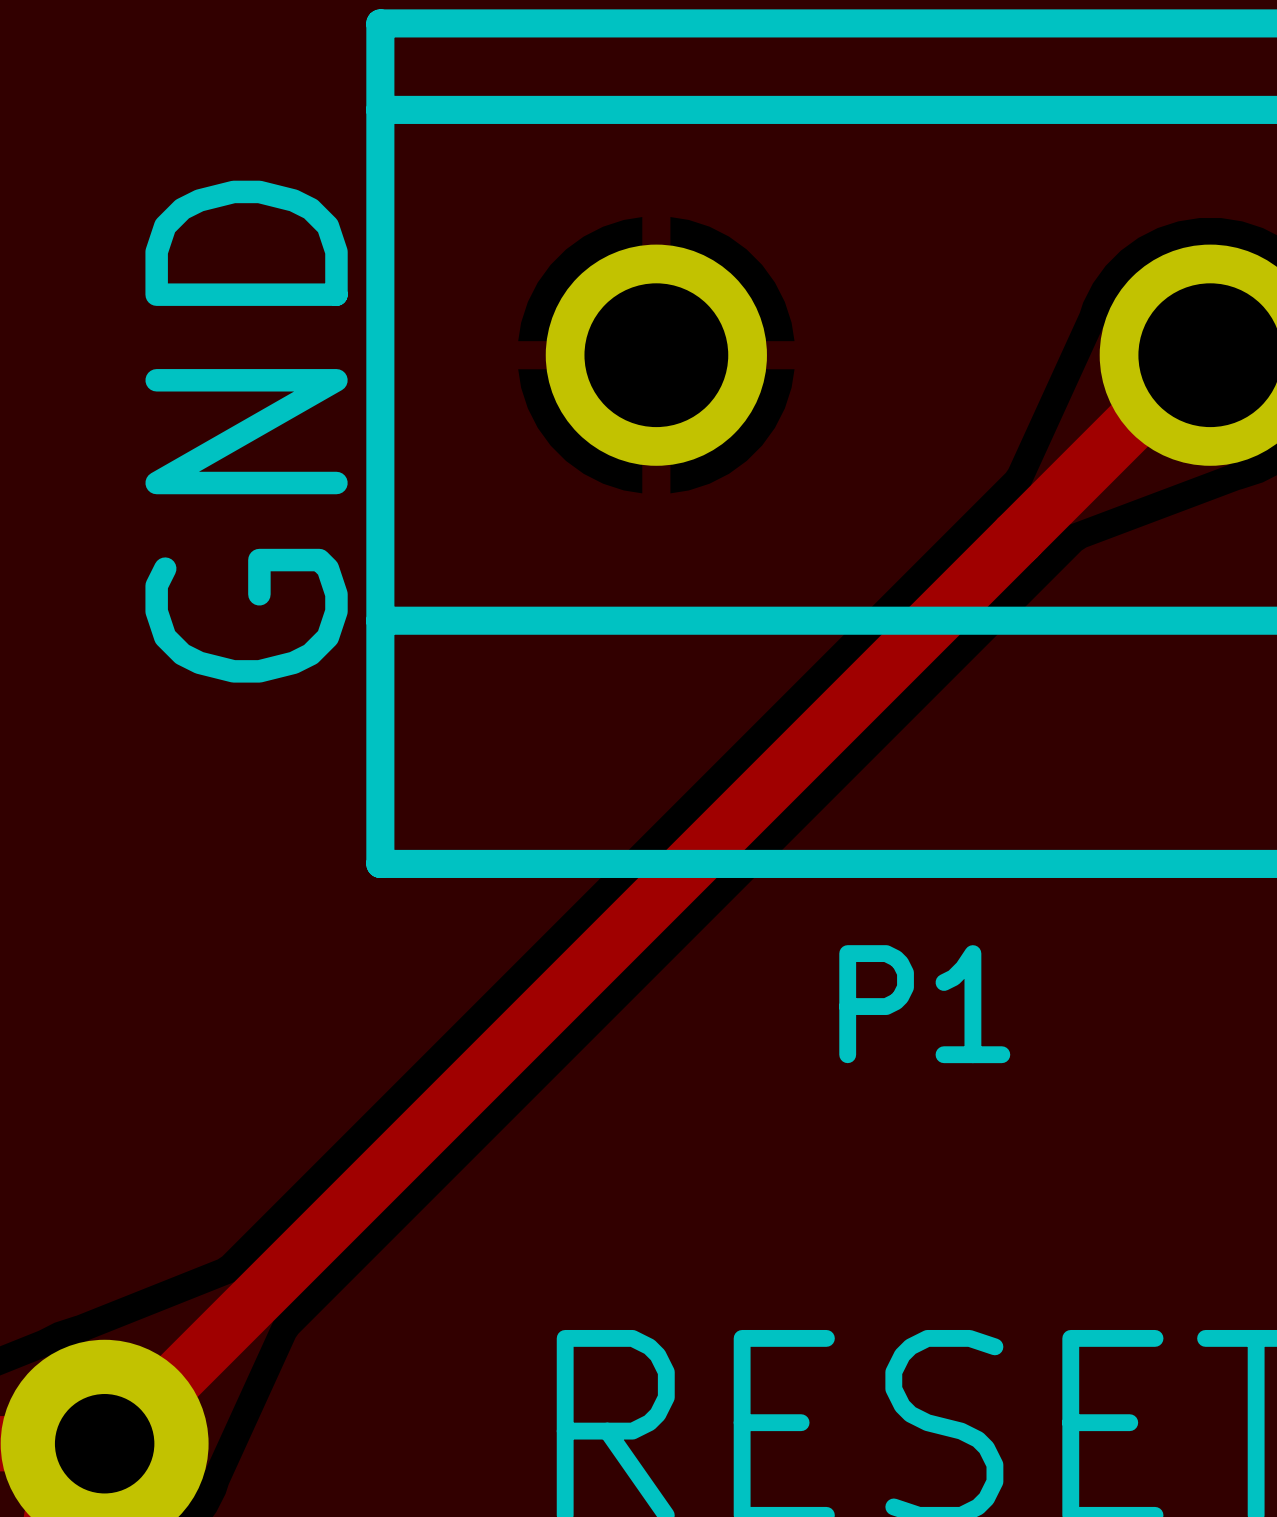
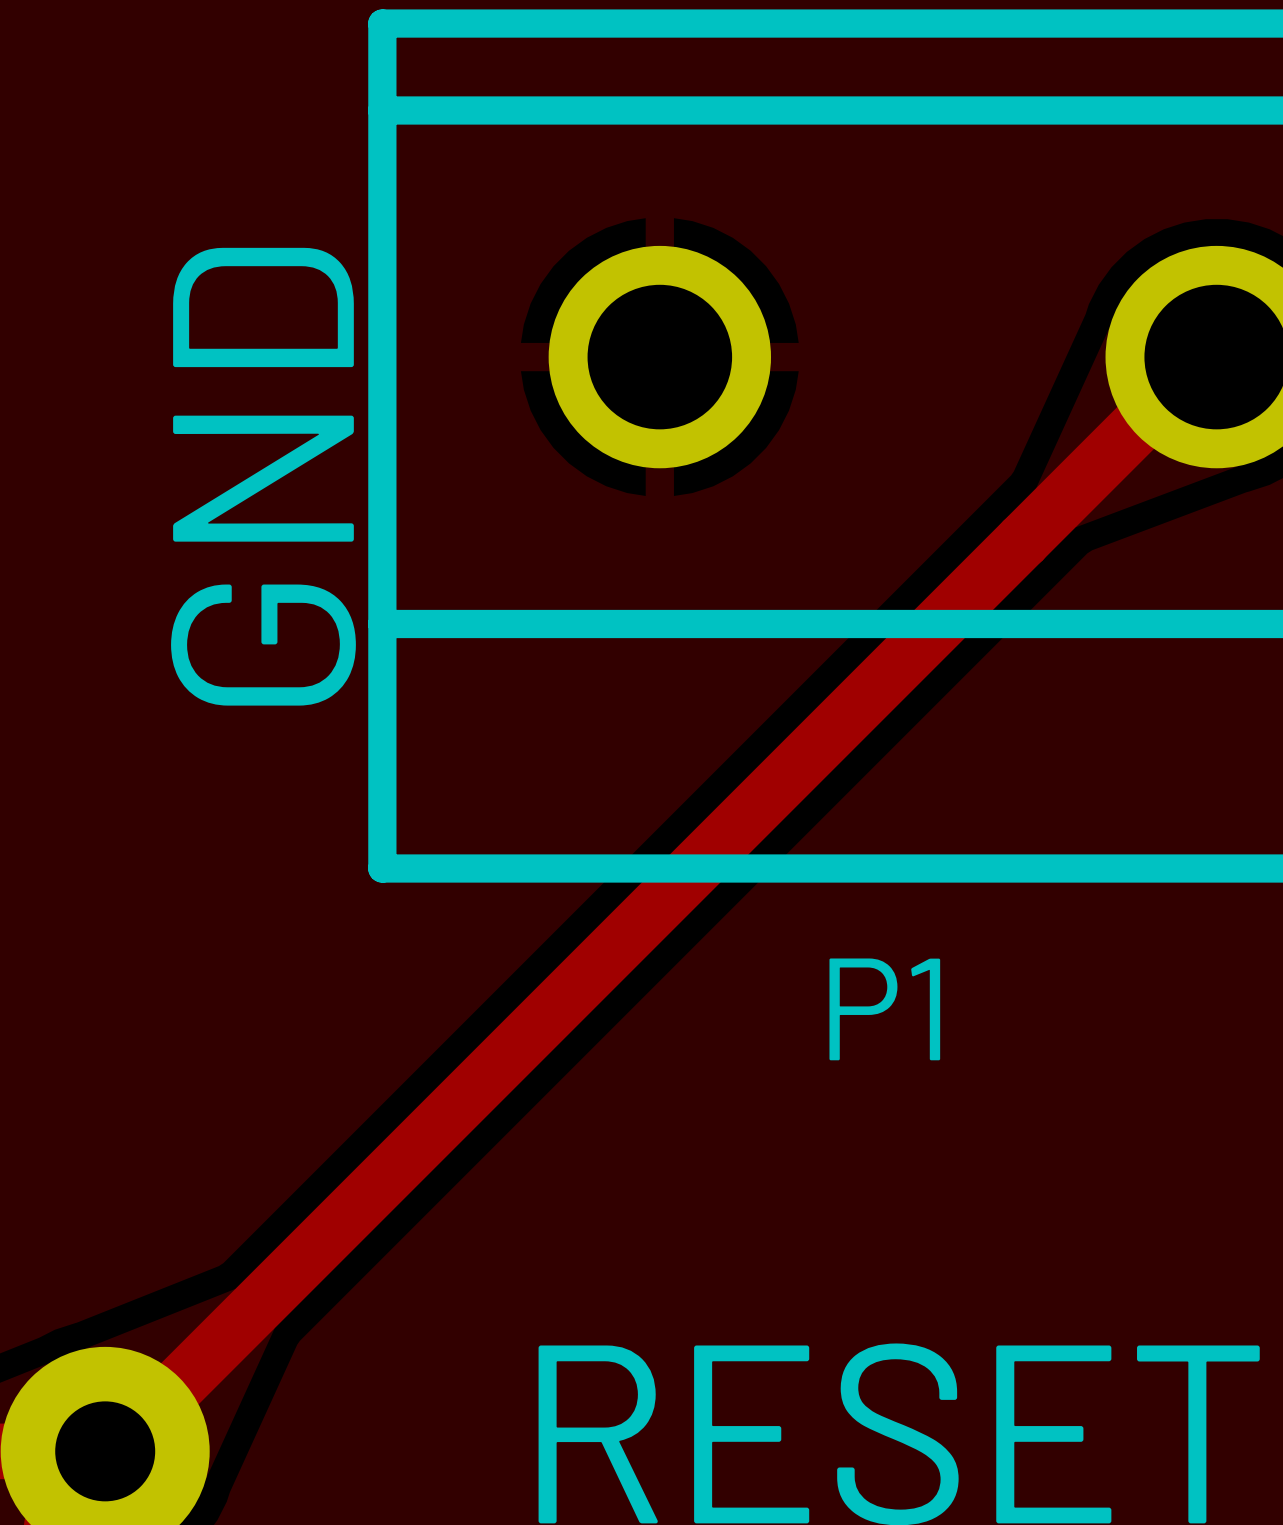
text position: GND (246, 431) -> GND (263, 476)

